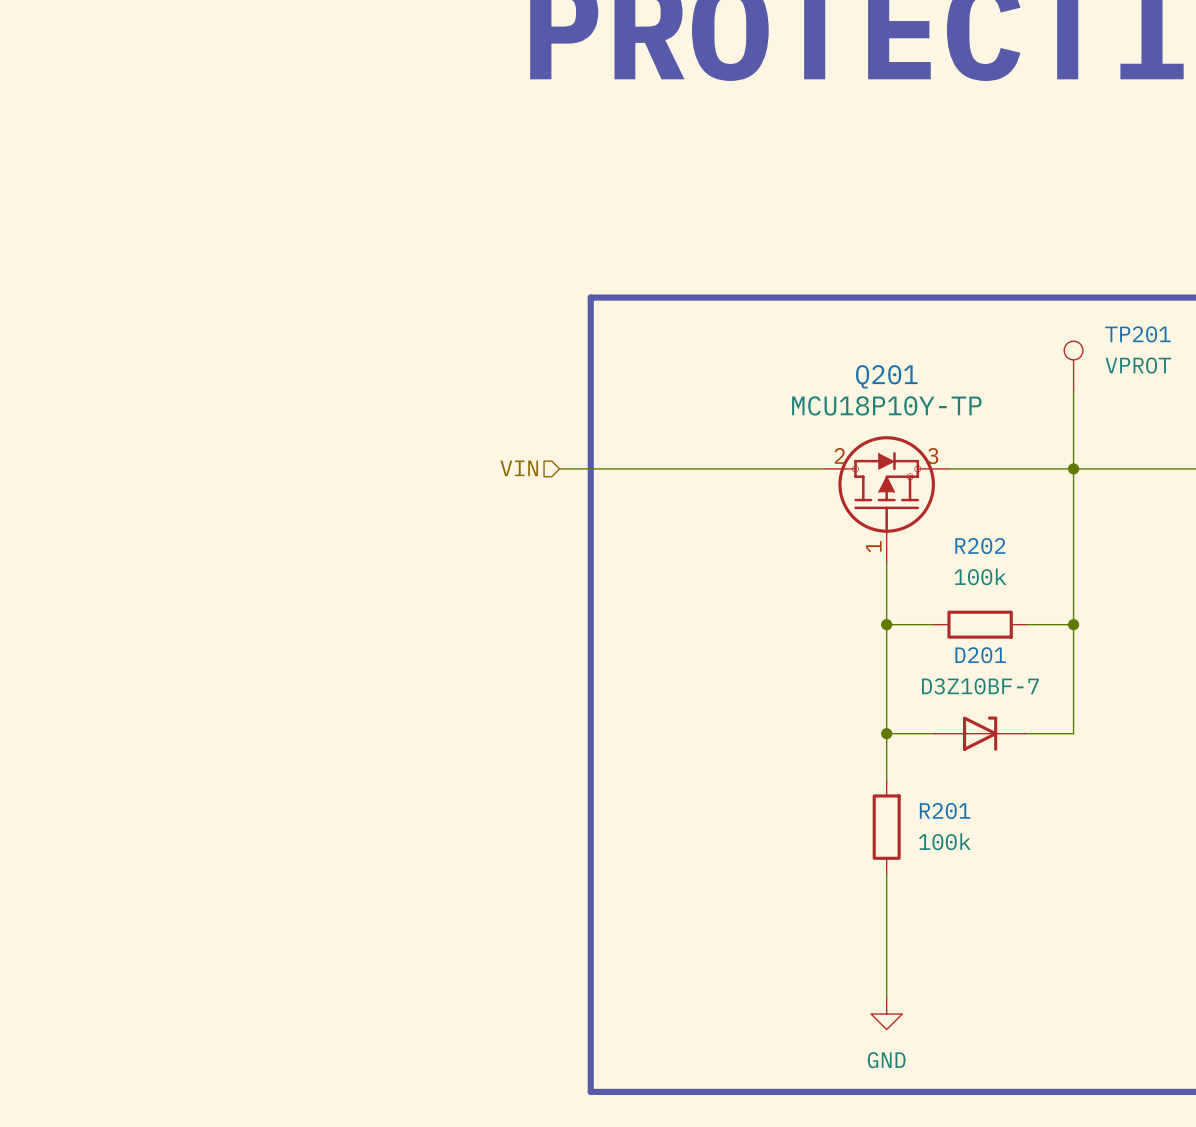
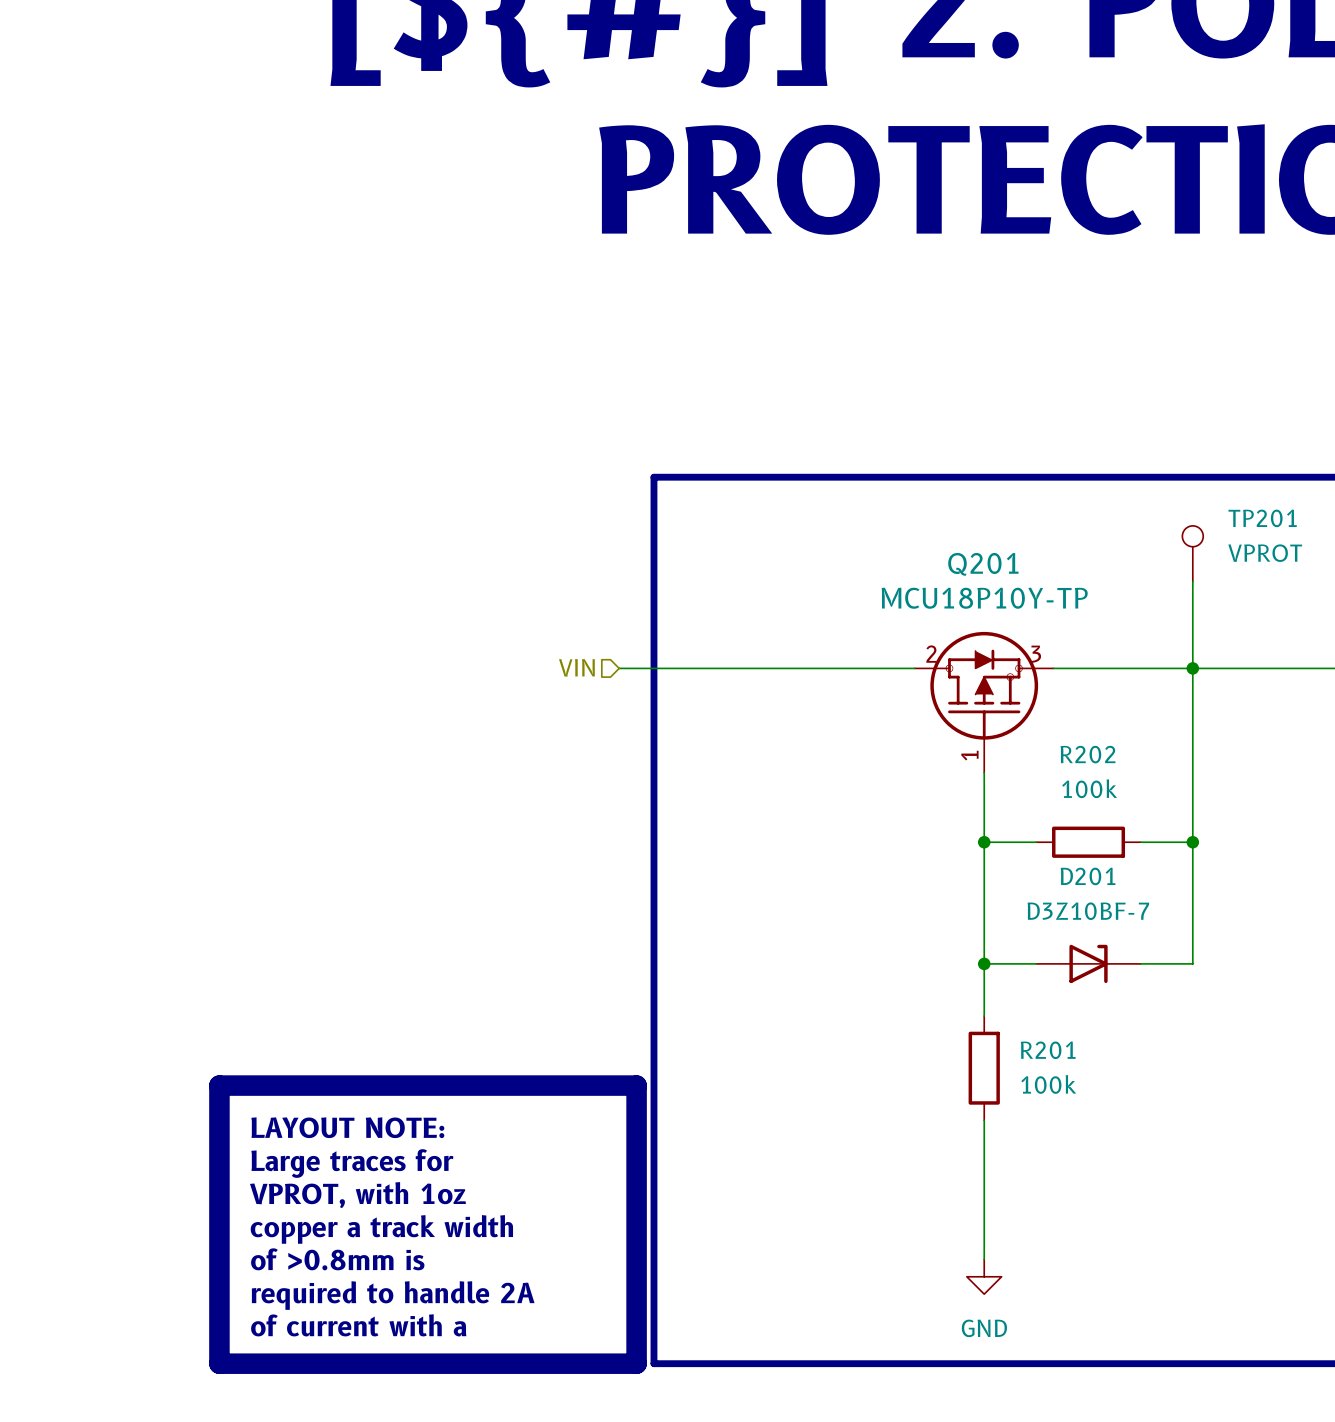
line: none -> (219, 1085) (636, 1085) (636, 1363) (219, 1363) (219, 1085)
text: none -> LAYOUT NOTE: (347, 1127)
text: none -> Large traces for (352, 1163)
text: none -> VPROT, with 1oz (357, 1195)
text: none -> copper a track width (381, 1229)
text: none -> of >0.8mm is (337, 1259)
text: none -> required to handle 2A (393, 1295)
text: none -> of current with a (358, 1325)

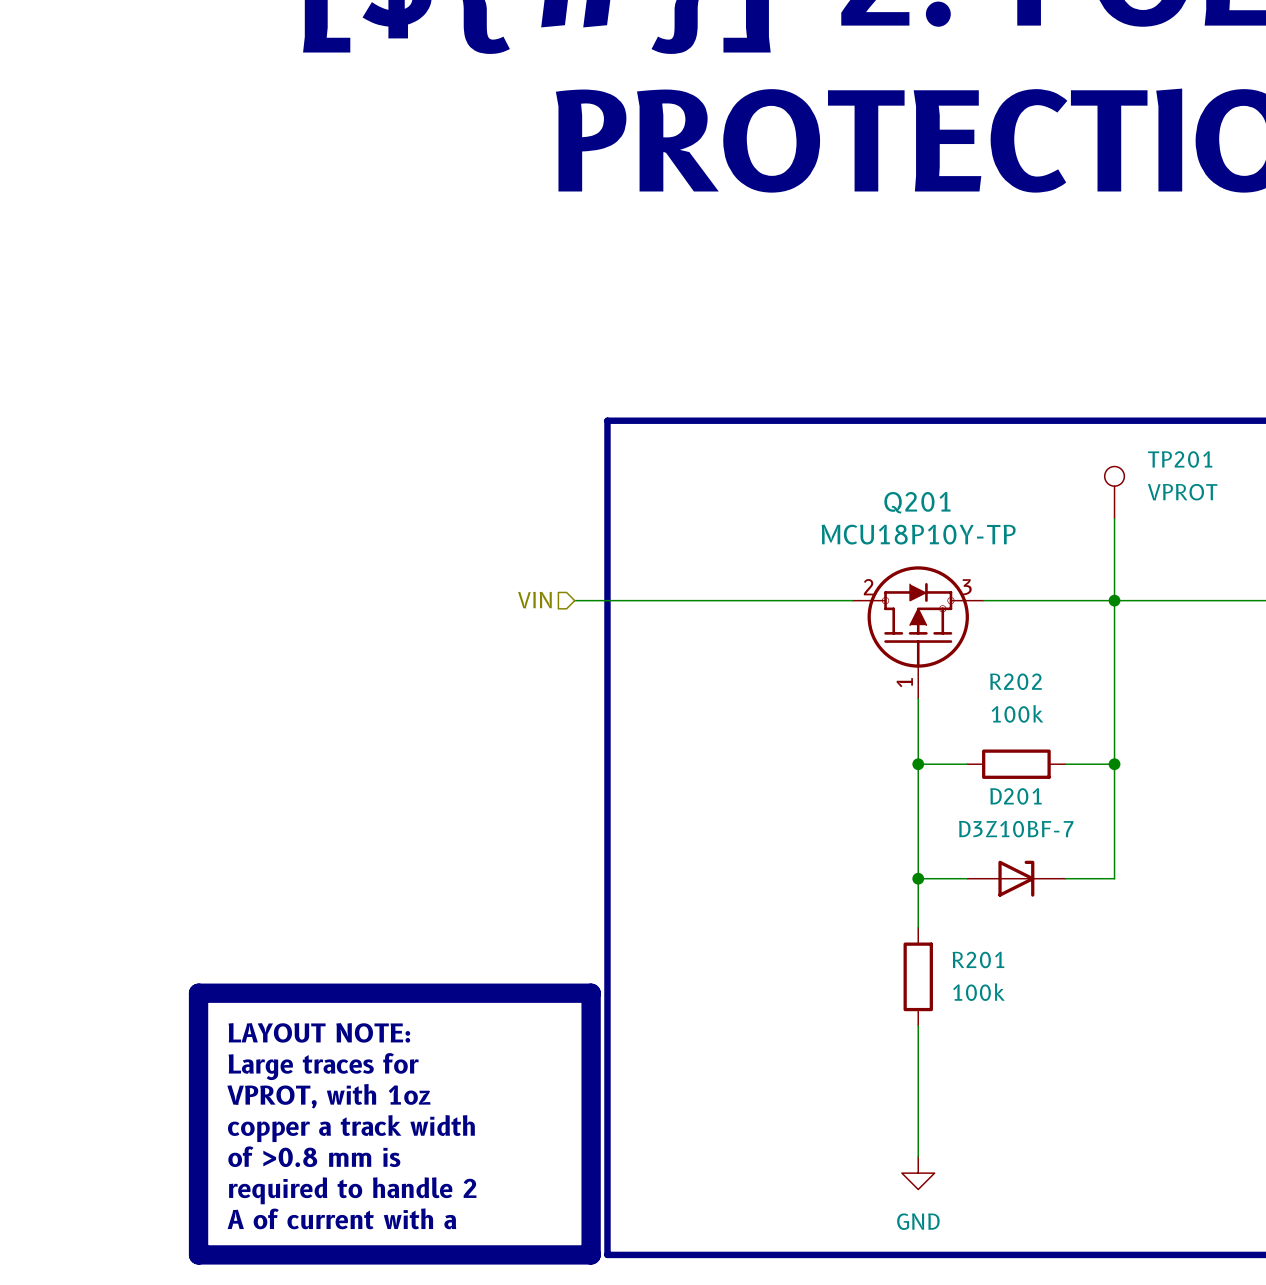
text: of >0.8mm is (337, 1259) -> of >0.8 mm is (314, 1156)
text: required to handle 2A (393, 1295) -> required to handle 2 (352, 1190)
text: of current with a (358, 1325) -> A of current with a (341, 1218)

